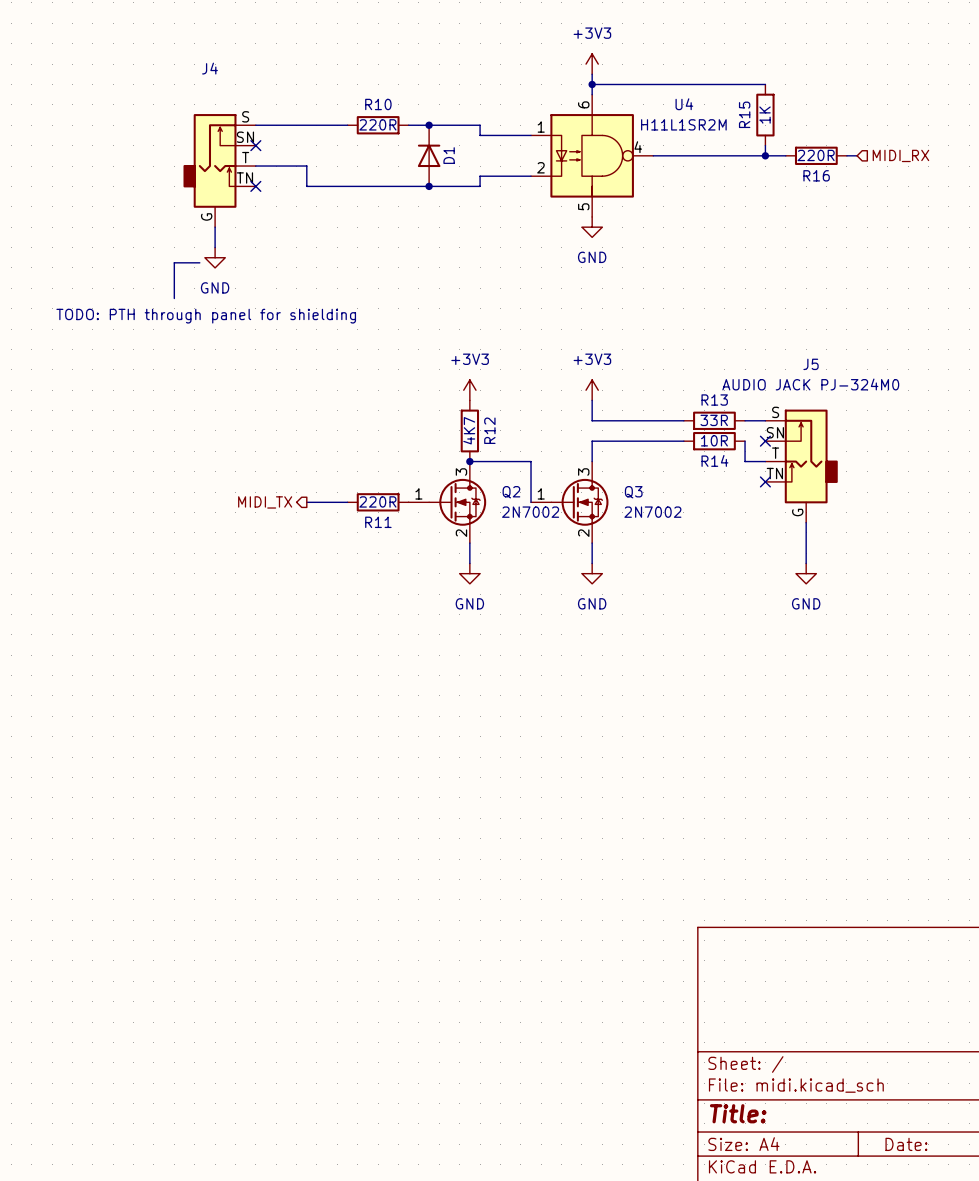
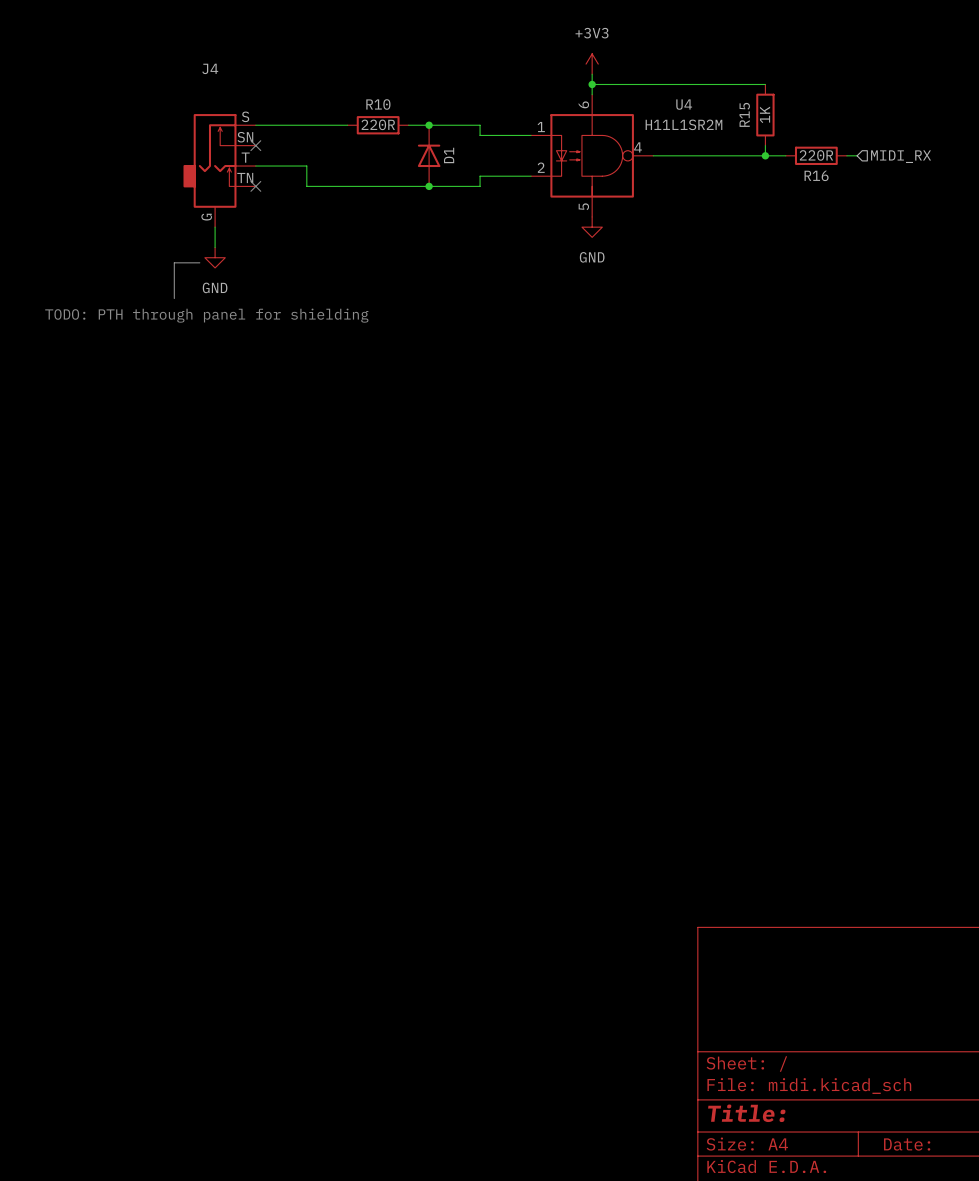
power symbol: +3V3 (469, 390) -> none
power symbol: +3V3 (592, 390) -> none
wire: (592, 400) (592, 420) (683, 420) -> none
R13: 33R (714, 420) -> none
wire: (745, 420) (765, 420) -> none
R12: 4K7 (469, 430) -> none
wire: (683, 441) (592, 441) (592, 461) -> none
R14: 10R (714, 441) -> none
wire: (745, 441) (745, 461) (765, 461) -> none
no-connect mark: (765, 441) -> none
wire: (469, 461) (531, 461) (531, 502) -> none
junction: (469, 461) -> none
J5: AUDIO JACK PJ-324M0 (801, 466) -> none
no-connect mark: (765, 481) -> none
hierarchical label: MIDI_TX (265, 502) -> none
wire: (306, 502) (347, 502) -> none
R11: 220R (378, 502) -> none
Q2: 2N7002 (447, 502) -> none
Q3: 2N7002 (569, 502) -> none
wire: (806, 522) (806, 563) -> none
wire: (469, 543) (469, 563) -> none
wire: (592, 543) (592, 563) -> none
power symbol: GND (469, 573) -> none
power symbol: GND (592, 573) -> none
power symbol: GND (806, 573) -> none

